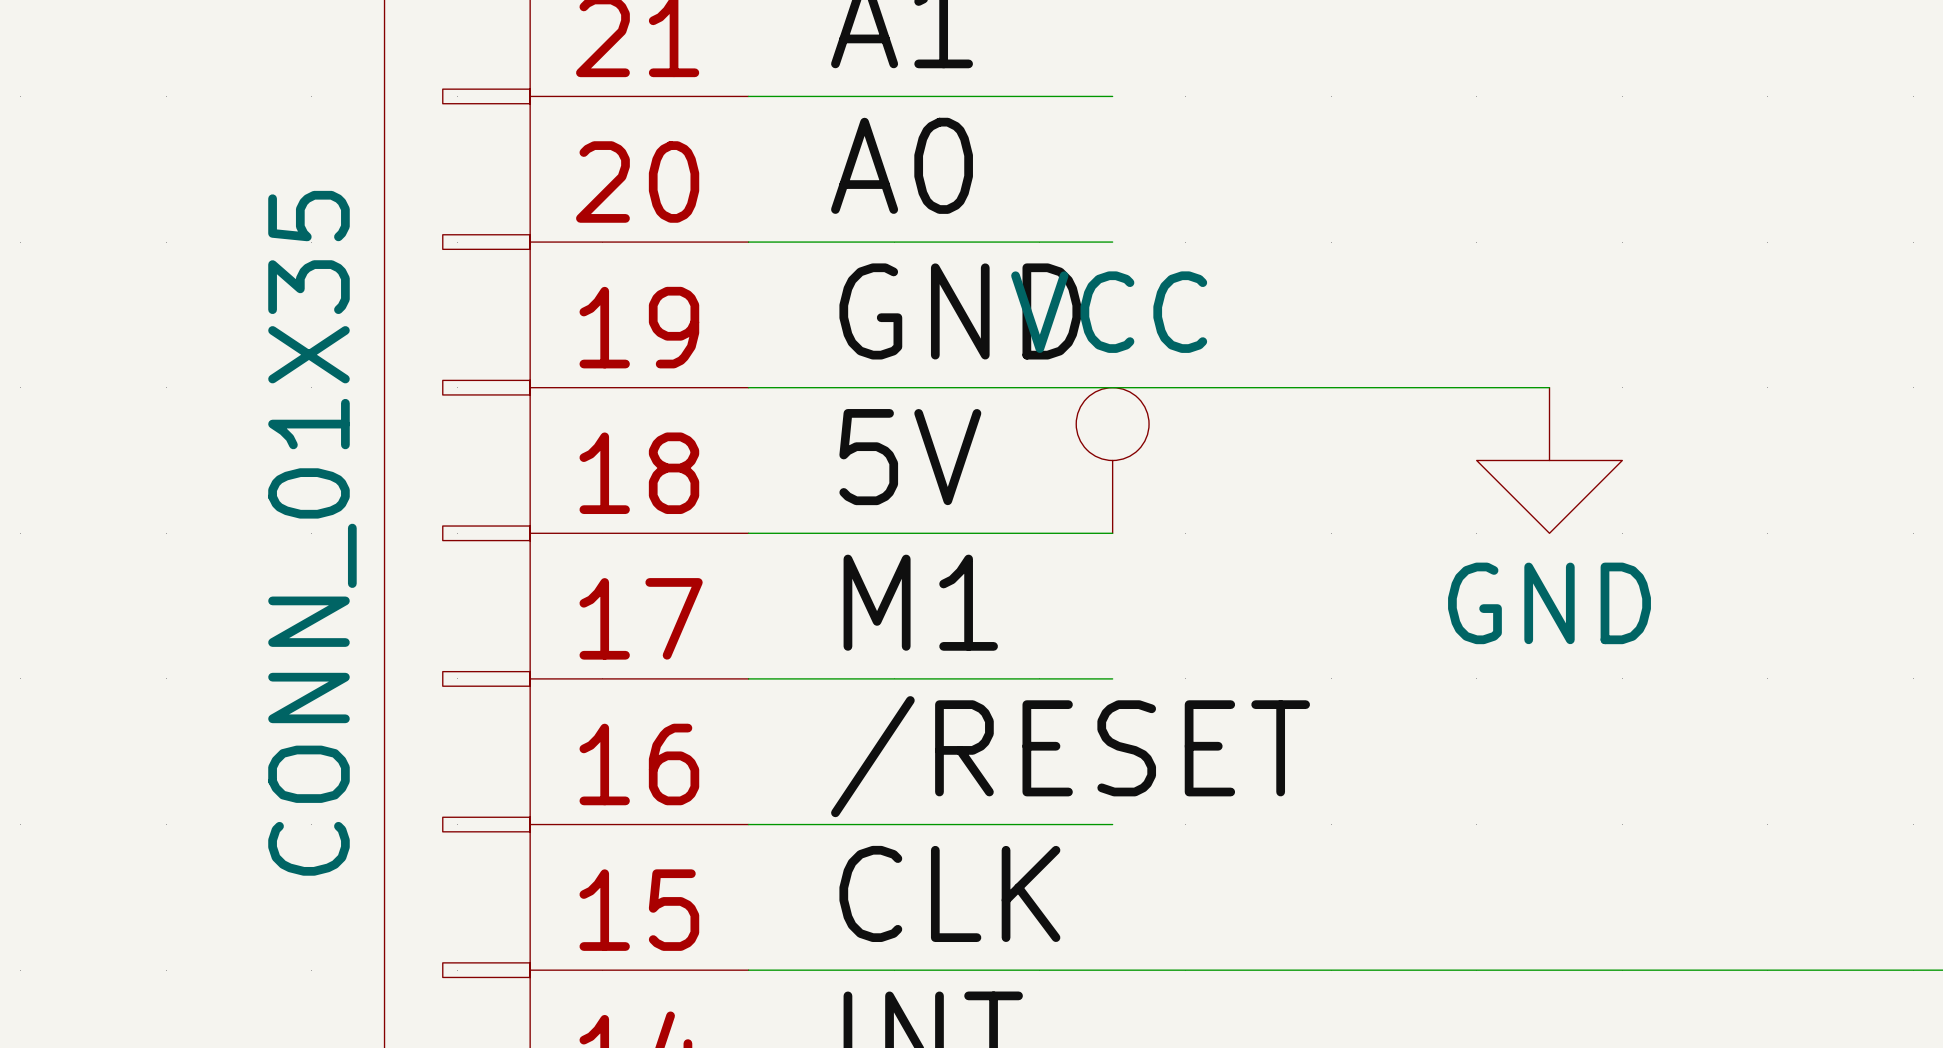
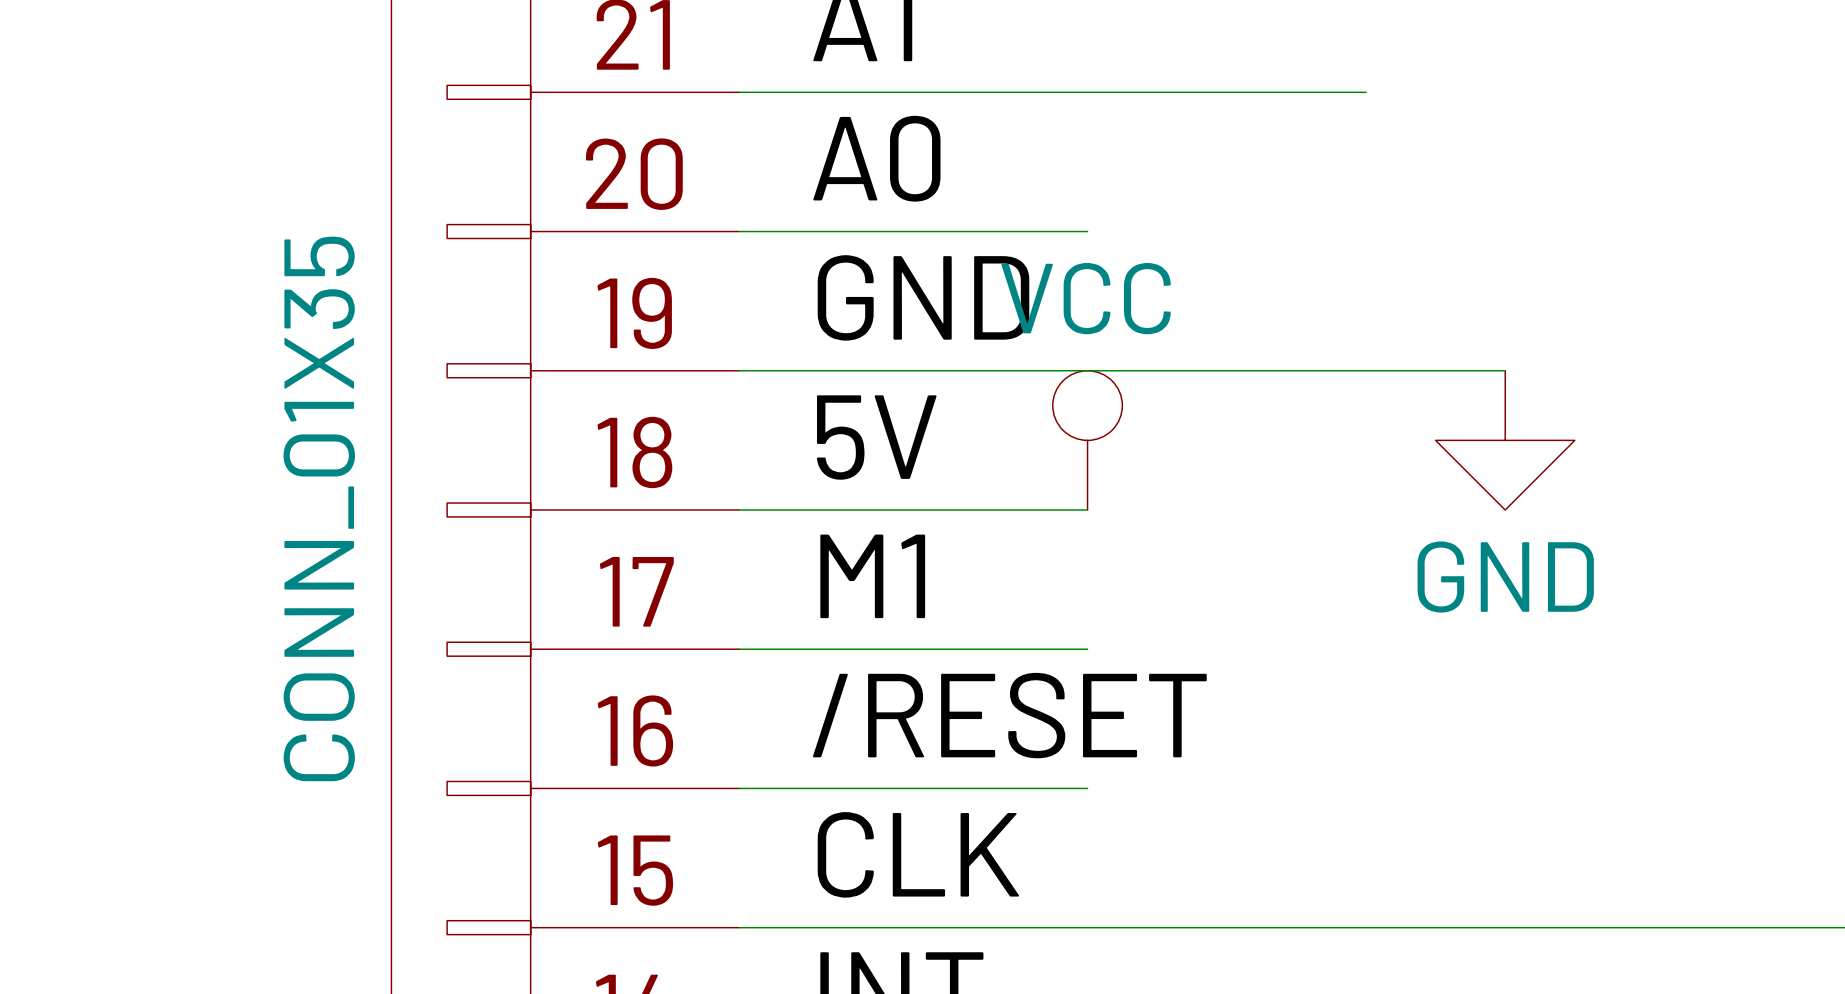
wire: none -> (1087, 92) (1366, 92)

